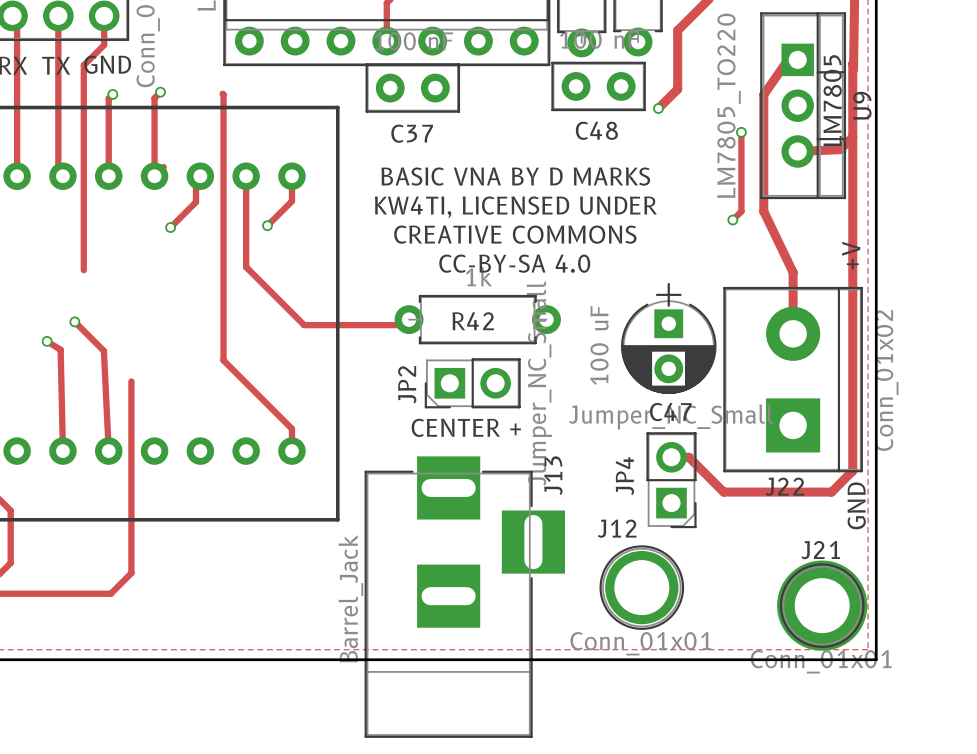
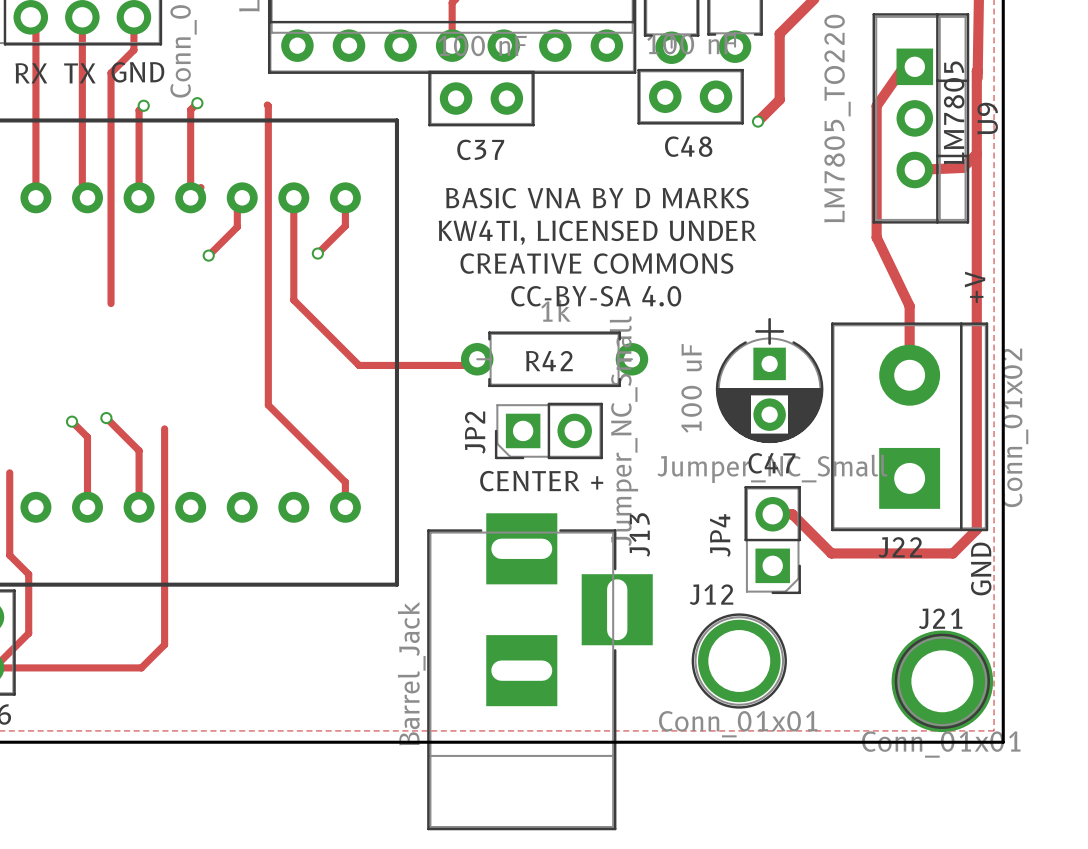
track: (741, 132) (741, 211) (732, 220) -> none
via: (741, 132) -> none
via: (732, 220) -> none
track: (74, 321) (103, 350) (108, 451) -> (106, 418) (139, 450) (139, 507)
via: (74, 321) -> none
track: (47, 341) (60, 349) (62, 451) -> (72, 421) (87, 437) (87, 507)
via: (47, 341) -> none
via: none -> (106, 418)
via: none -> (72, 421)

